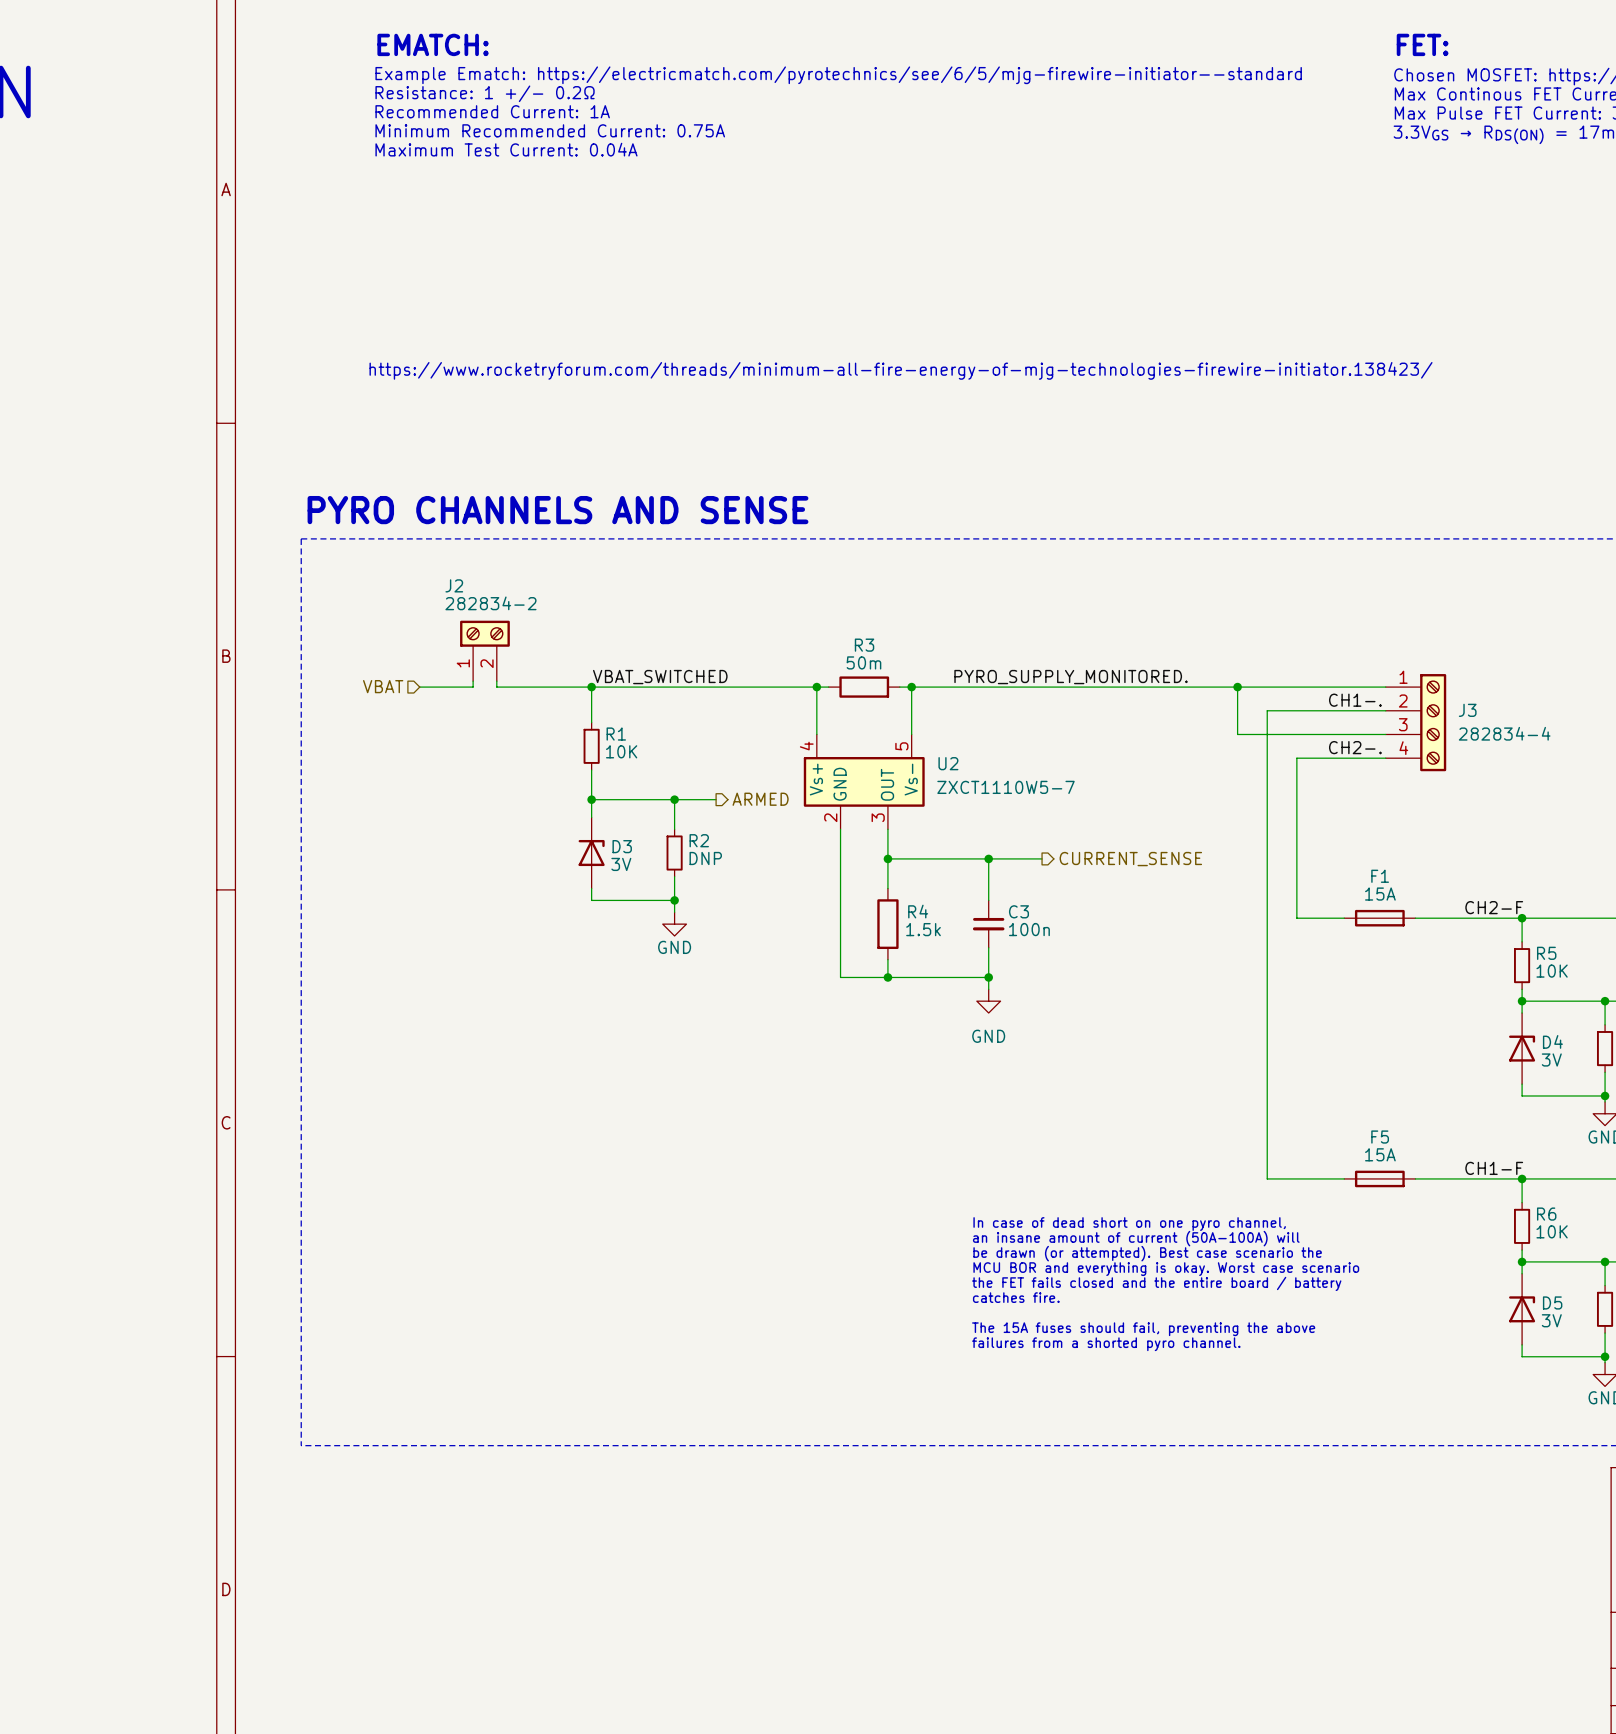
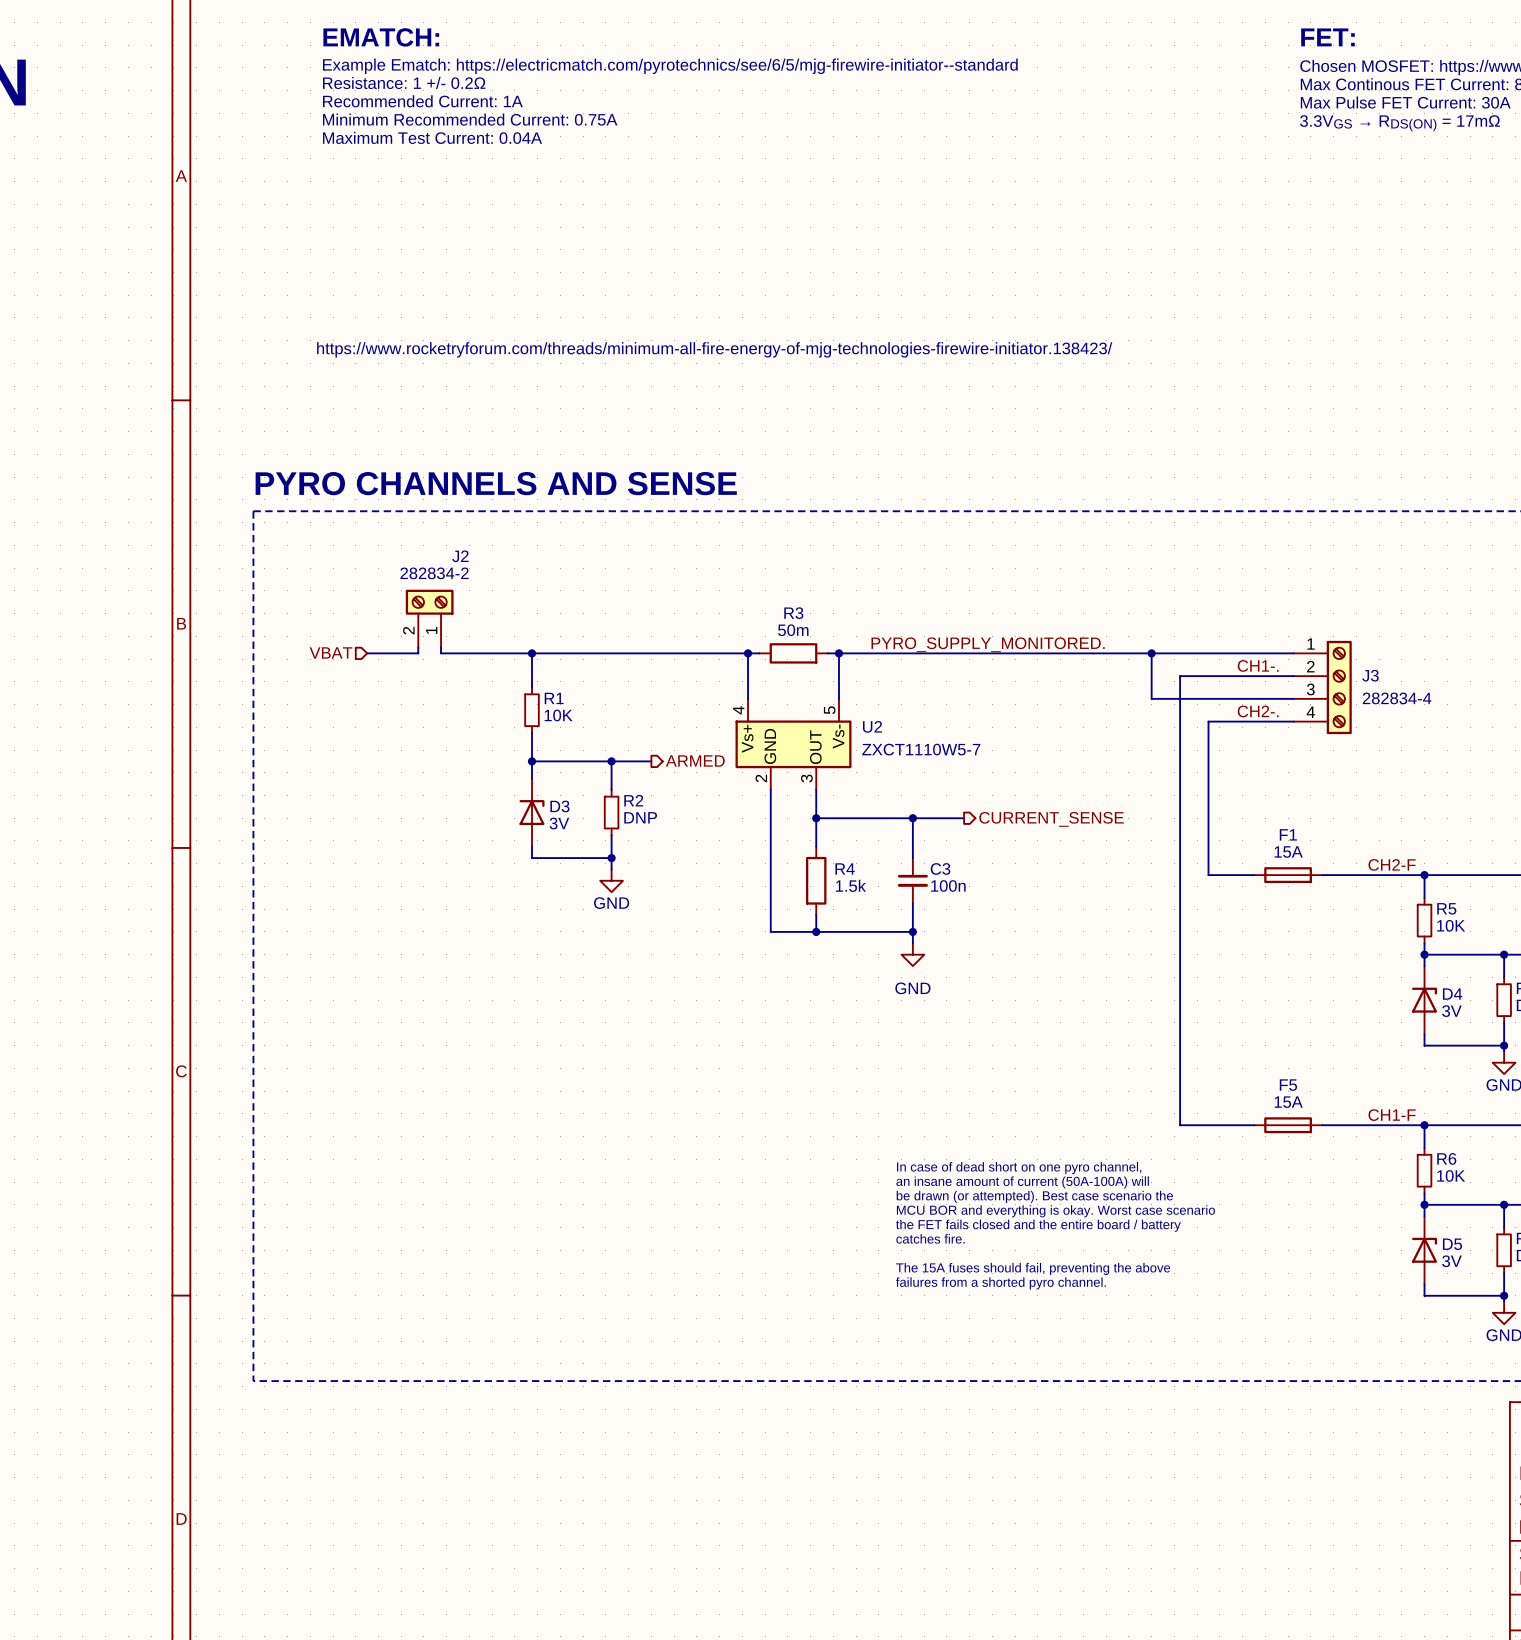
J2 flip: as is (484, 633) -> left-right (429, 602)
label: VBAT_SWITCHED (660, 677) -> none

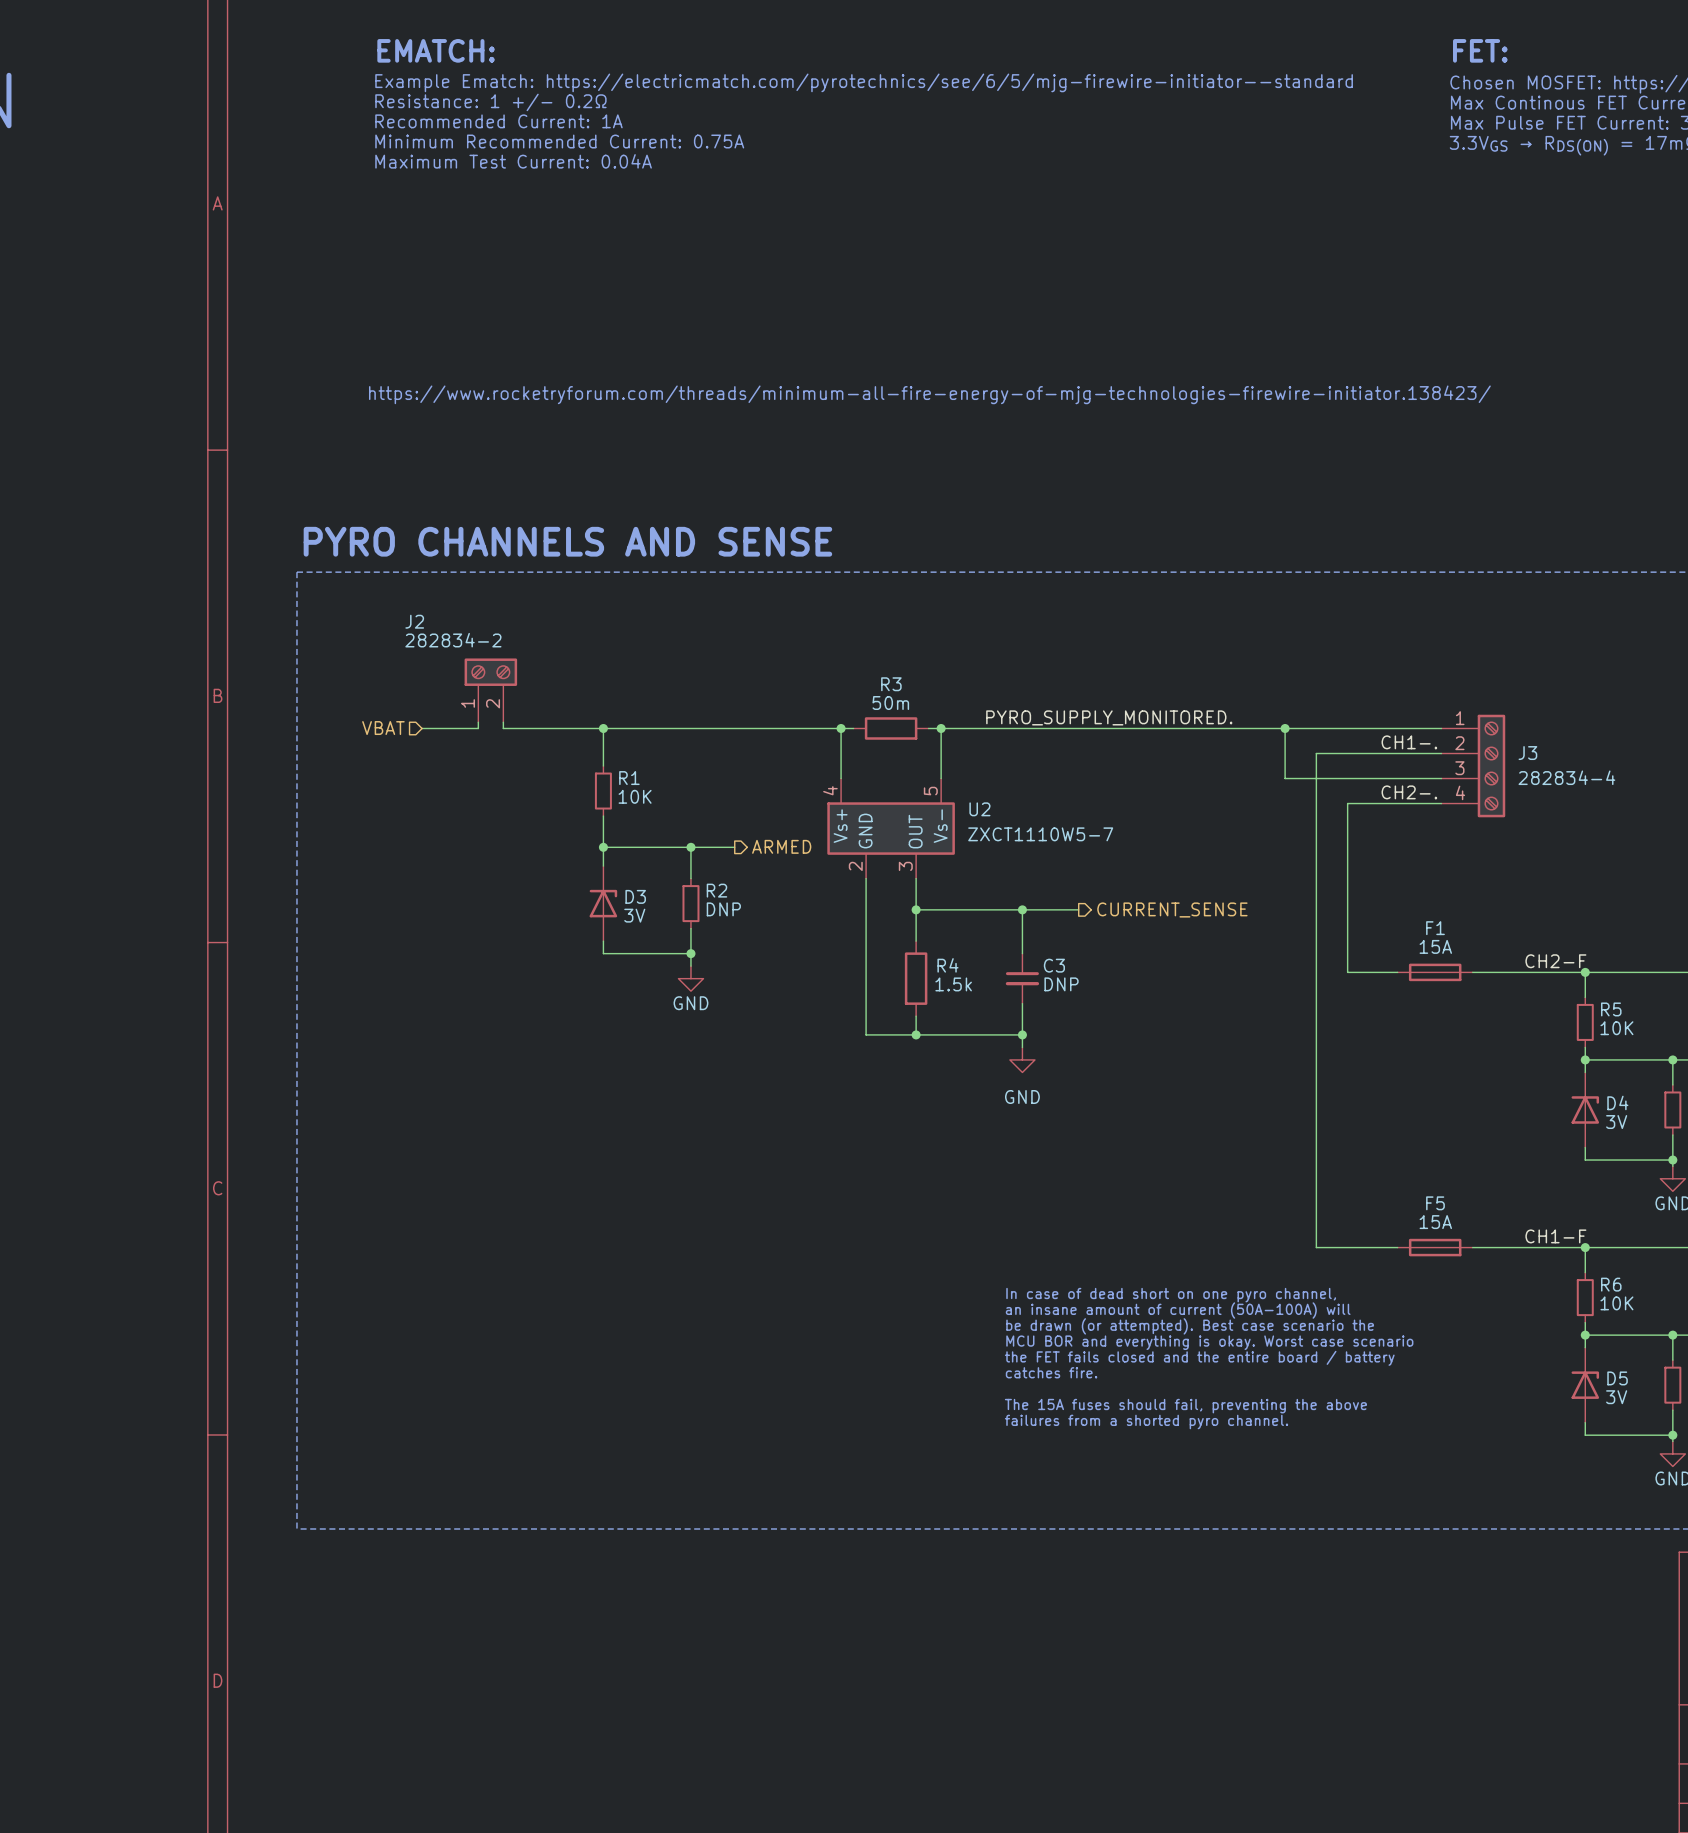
J2 name position: J2 (460, 556) -> J2 (414, 621)
J2 value position: 282834-2 (434, 573) -> 282834-2 (453, 640)
J2 flip: as is (429, 602) -> left-right (490, 672)
C3 value: 100n (948, 885) -> DNP (1061, 984)

